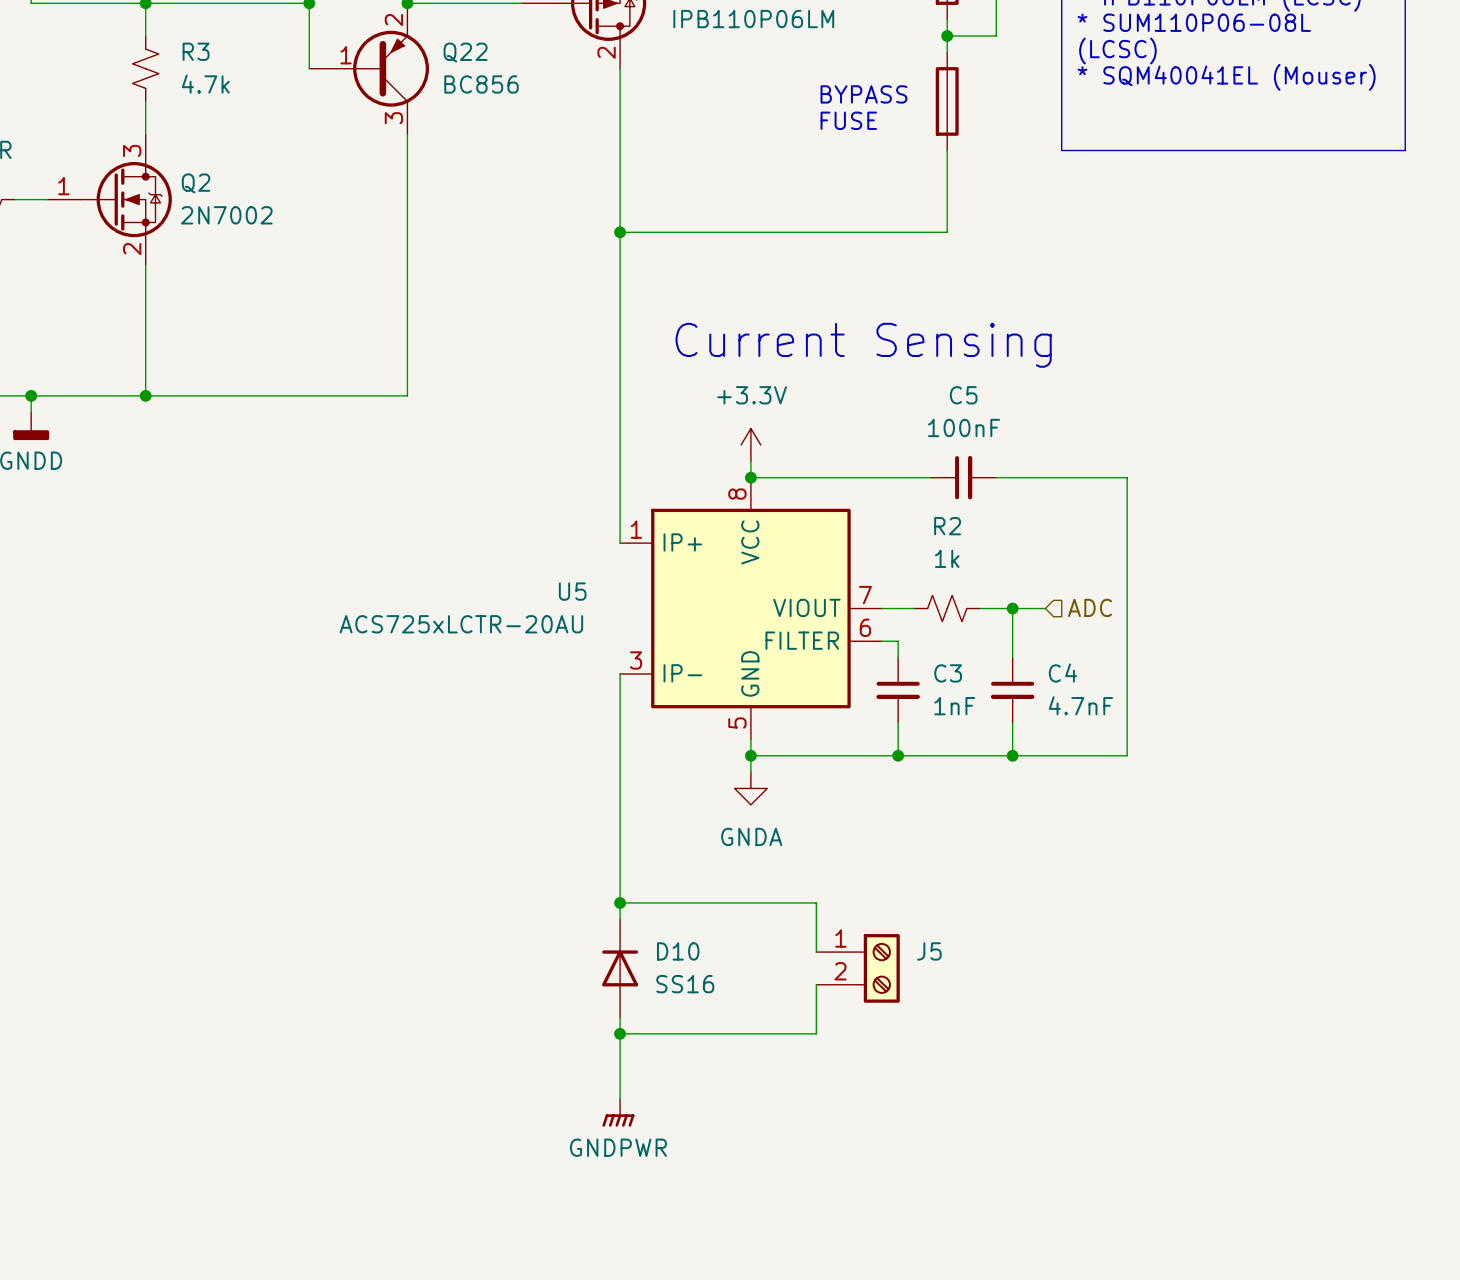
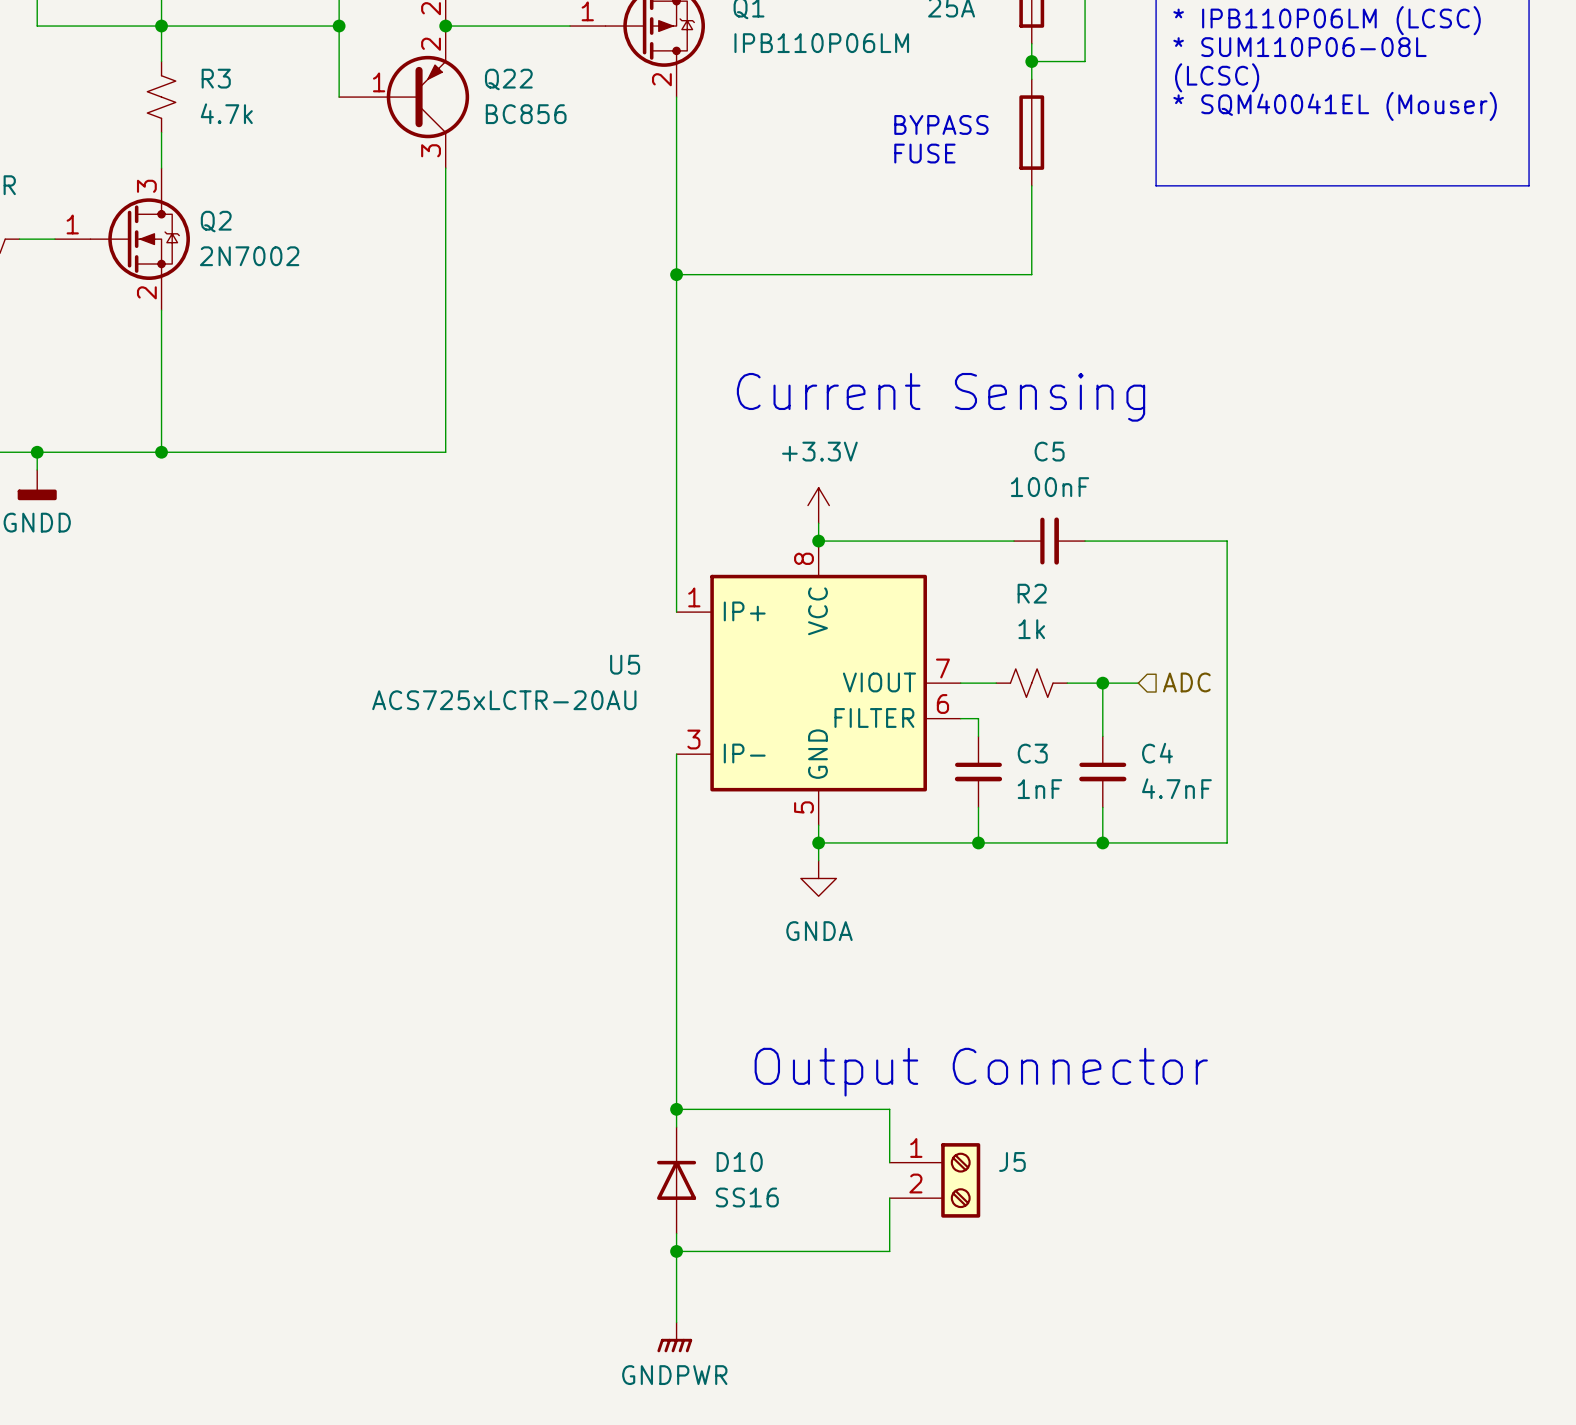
wire: (620, 902) (816, 902) (816, 952) -> none
junction: (620, 902) -> none
text: none -> Output Connector (981, 1072)
D10 position: (620, 968) -> (676, 1180)
J5 position: (858, 968) -> (934, 1180)
wire: (816, 984) (816, 1001) -> (676, 1109) (889, 1109)
wire: (620, 1033) (816, 1033) -> (889, 1162) (889, 1144)
junction position: (620, 1033) -> (676, 1109)
wire: none -> (889, 1198) (889, 1251) (676, 1251)
power symbol position: GNDPWR (618, 1113) -> GNDPWR (674, 1337)
wire: none -> (676, 1233) (676, 1322)
junction: none -> (676, 1251)

